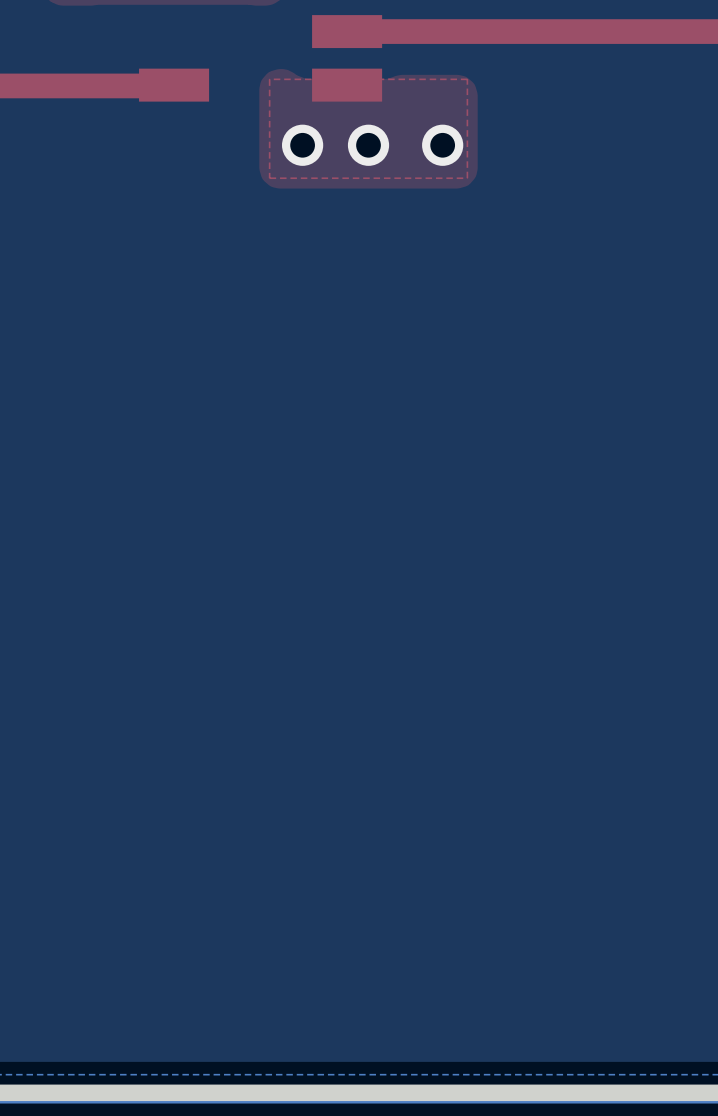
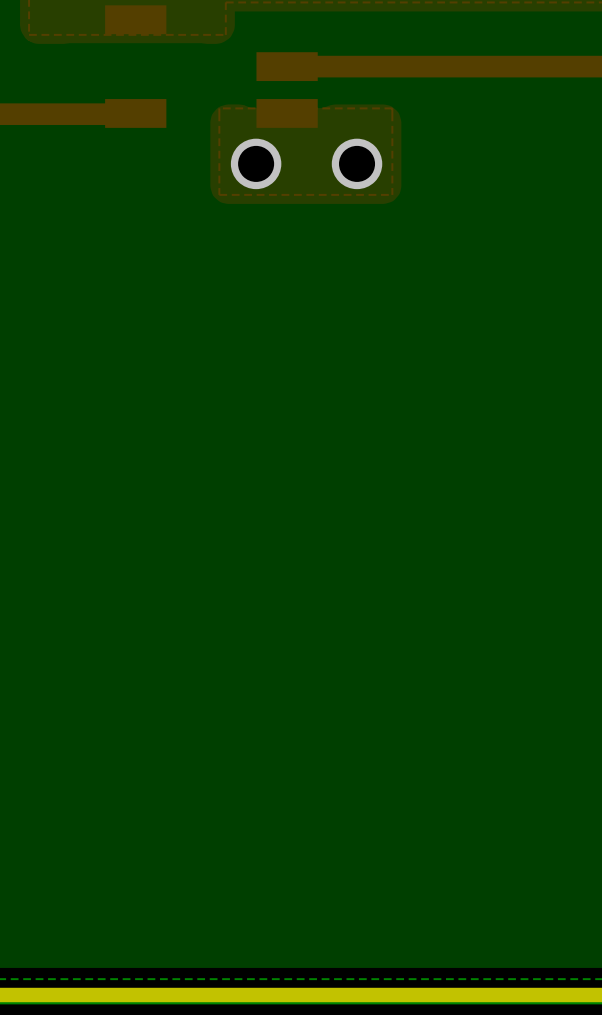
via size: [282, 124, 324, 166] -> [230, 138, 282, 190]
via size: [422, 124, 464, 166] -> [331, 138, 383, 190]
via: (368, 145) -> none

